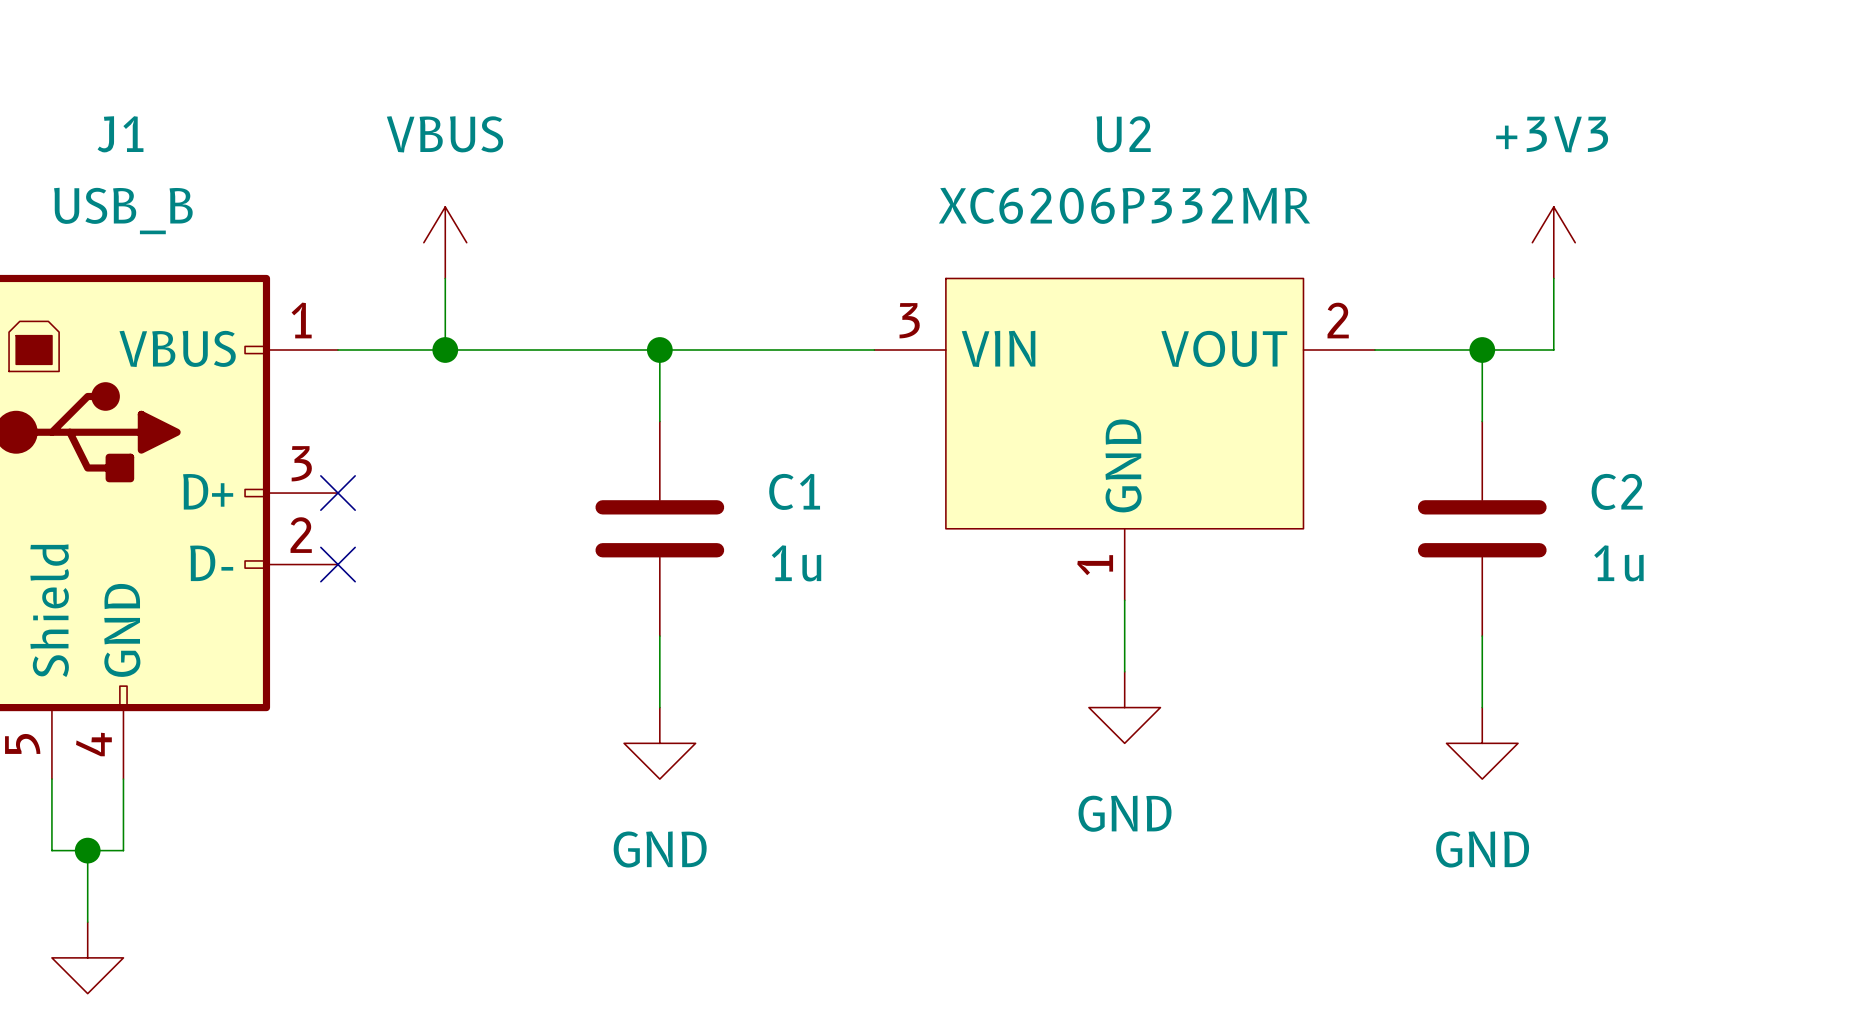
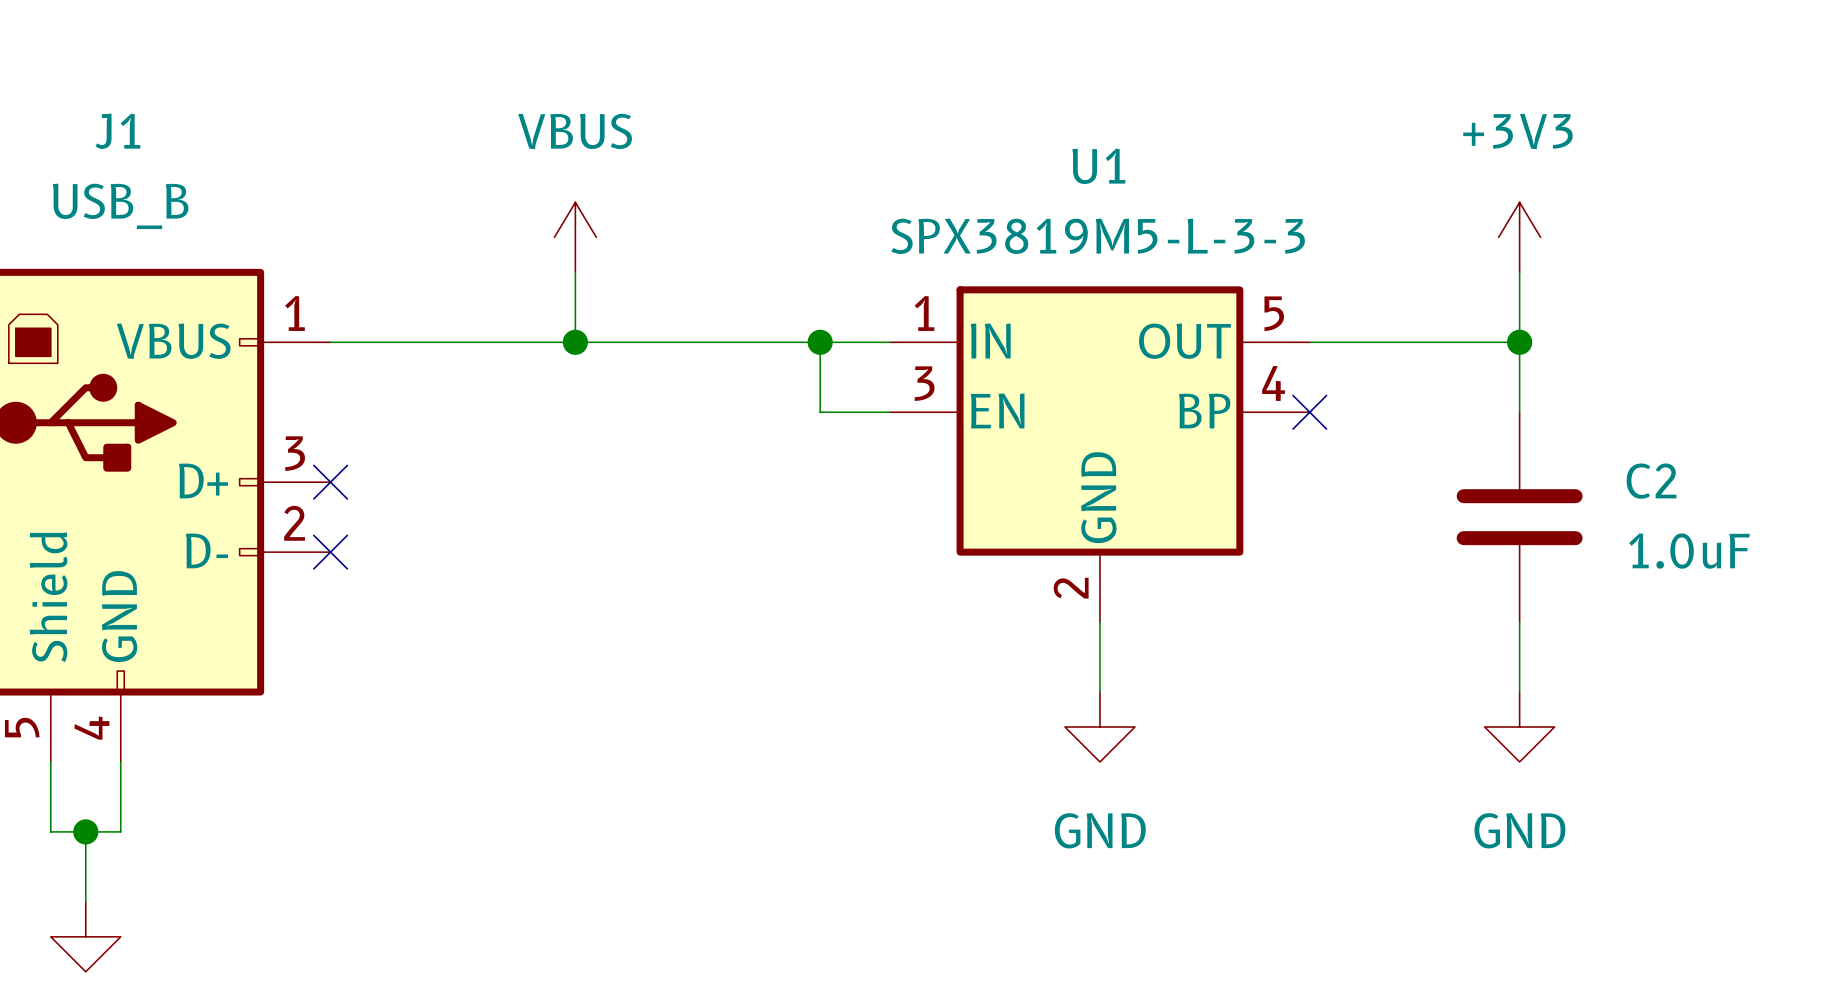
power symbol position: VBUS (445, 242) -> VBUS (575, 237)
wire: (445, 278) (445, 350) -> none
junction: (445, 350) -> none
junction: none -> (575, 342)
wire: (659, 350) (659, 421) -> (575, 272) (575, 342)
junction: (659, 350) -> none
wire: none -> (820, 342) (820, 412) (890, 412)
junction: none -> (820, 342)
wire: (1482, 350) (1482, 421) -> (1519, 342) (1519, 412)
junction position: (1482, 350) -> (1519, 342)
no-connect mark: none -> (1309, 412)
U2: XC6206P332MR (1124, 439) -> none
U1: none -> SPX3819M5-L-3-3 (1099, 454)
C1: 1u (659, 528) -> none
C2 position: (1482, 528) -> (1519, 517)
C2 value: 1u (1618, 563) -> 1.0uF (1689, 551)
wire: (659, 636) (659, 707) -> none
wire: (1482, 636) (1482, 707) -> (1519, 622) (1519, 692)
power symbol position: GND (1124, 707) -> GND (1099, 726)
power symbol: GND (659, 743) -> none
power symbol position: GND (1482, 743) -> GND (1519, 726)

